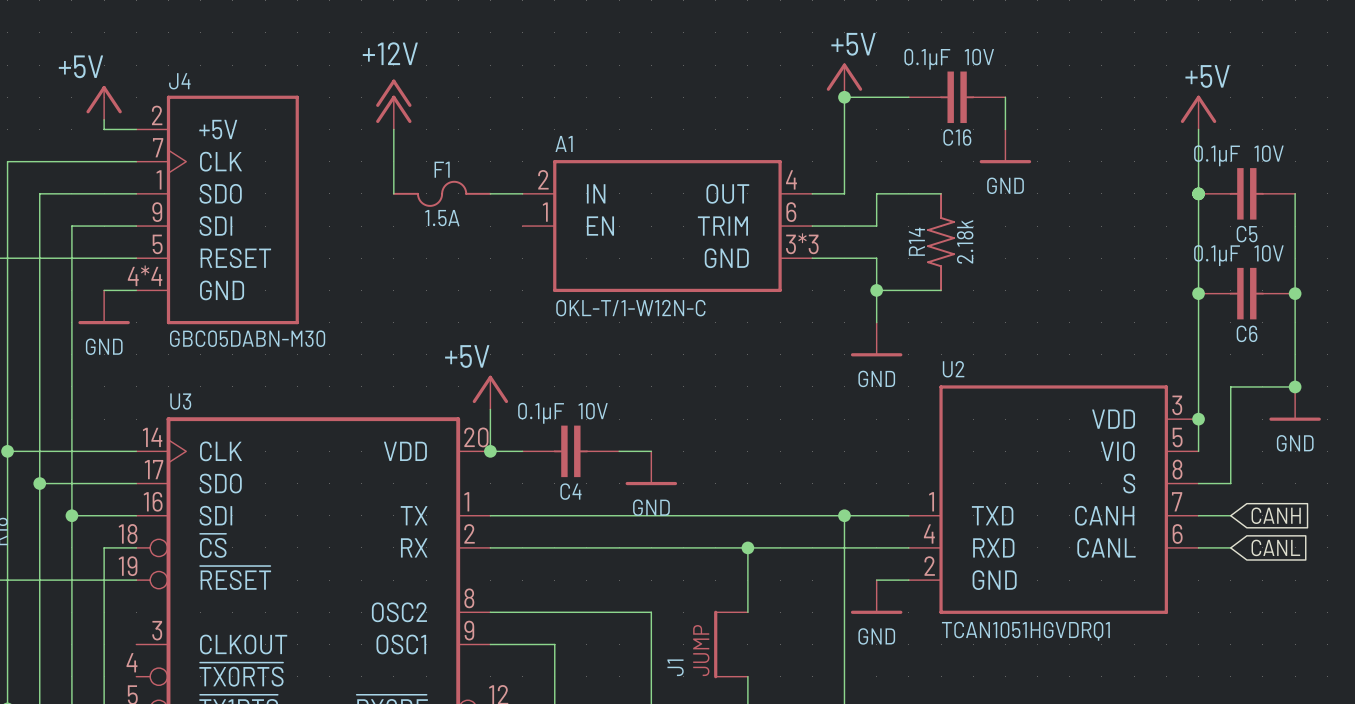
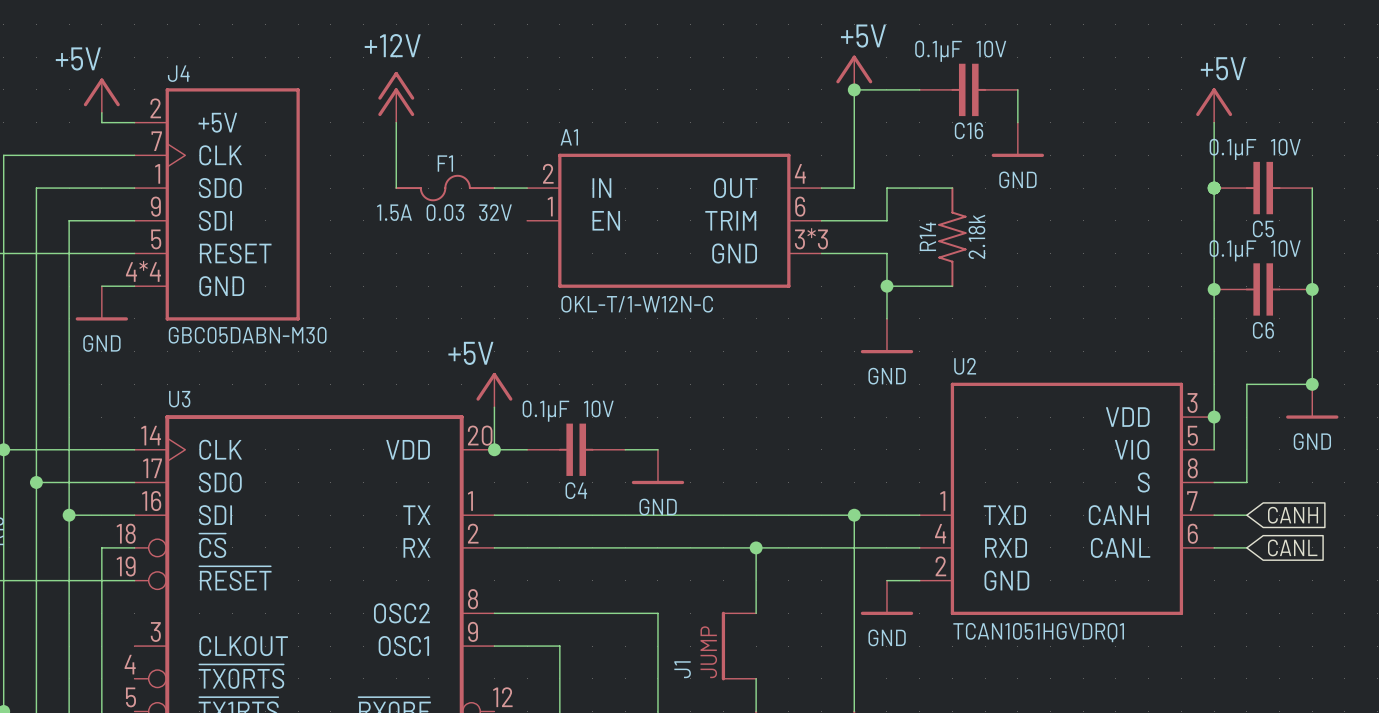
F1 text: none -> 32V (495, 212)
F1 text position: 1.5A (442, 218) -> 1.5A (394, 212)
F1 text: none -> 0.03 (445, 212)

